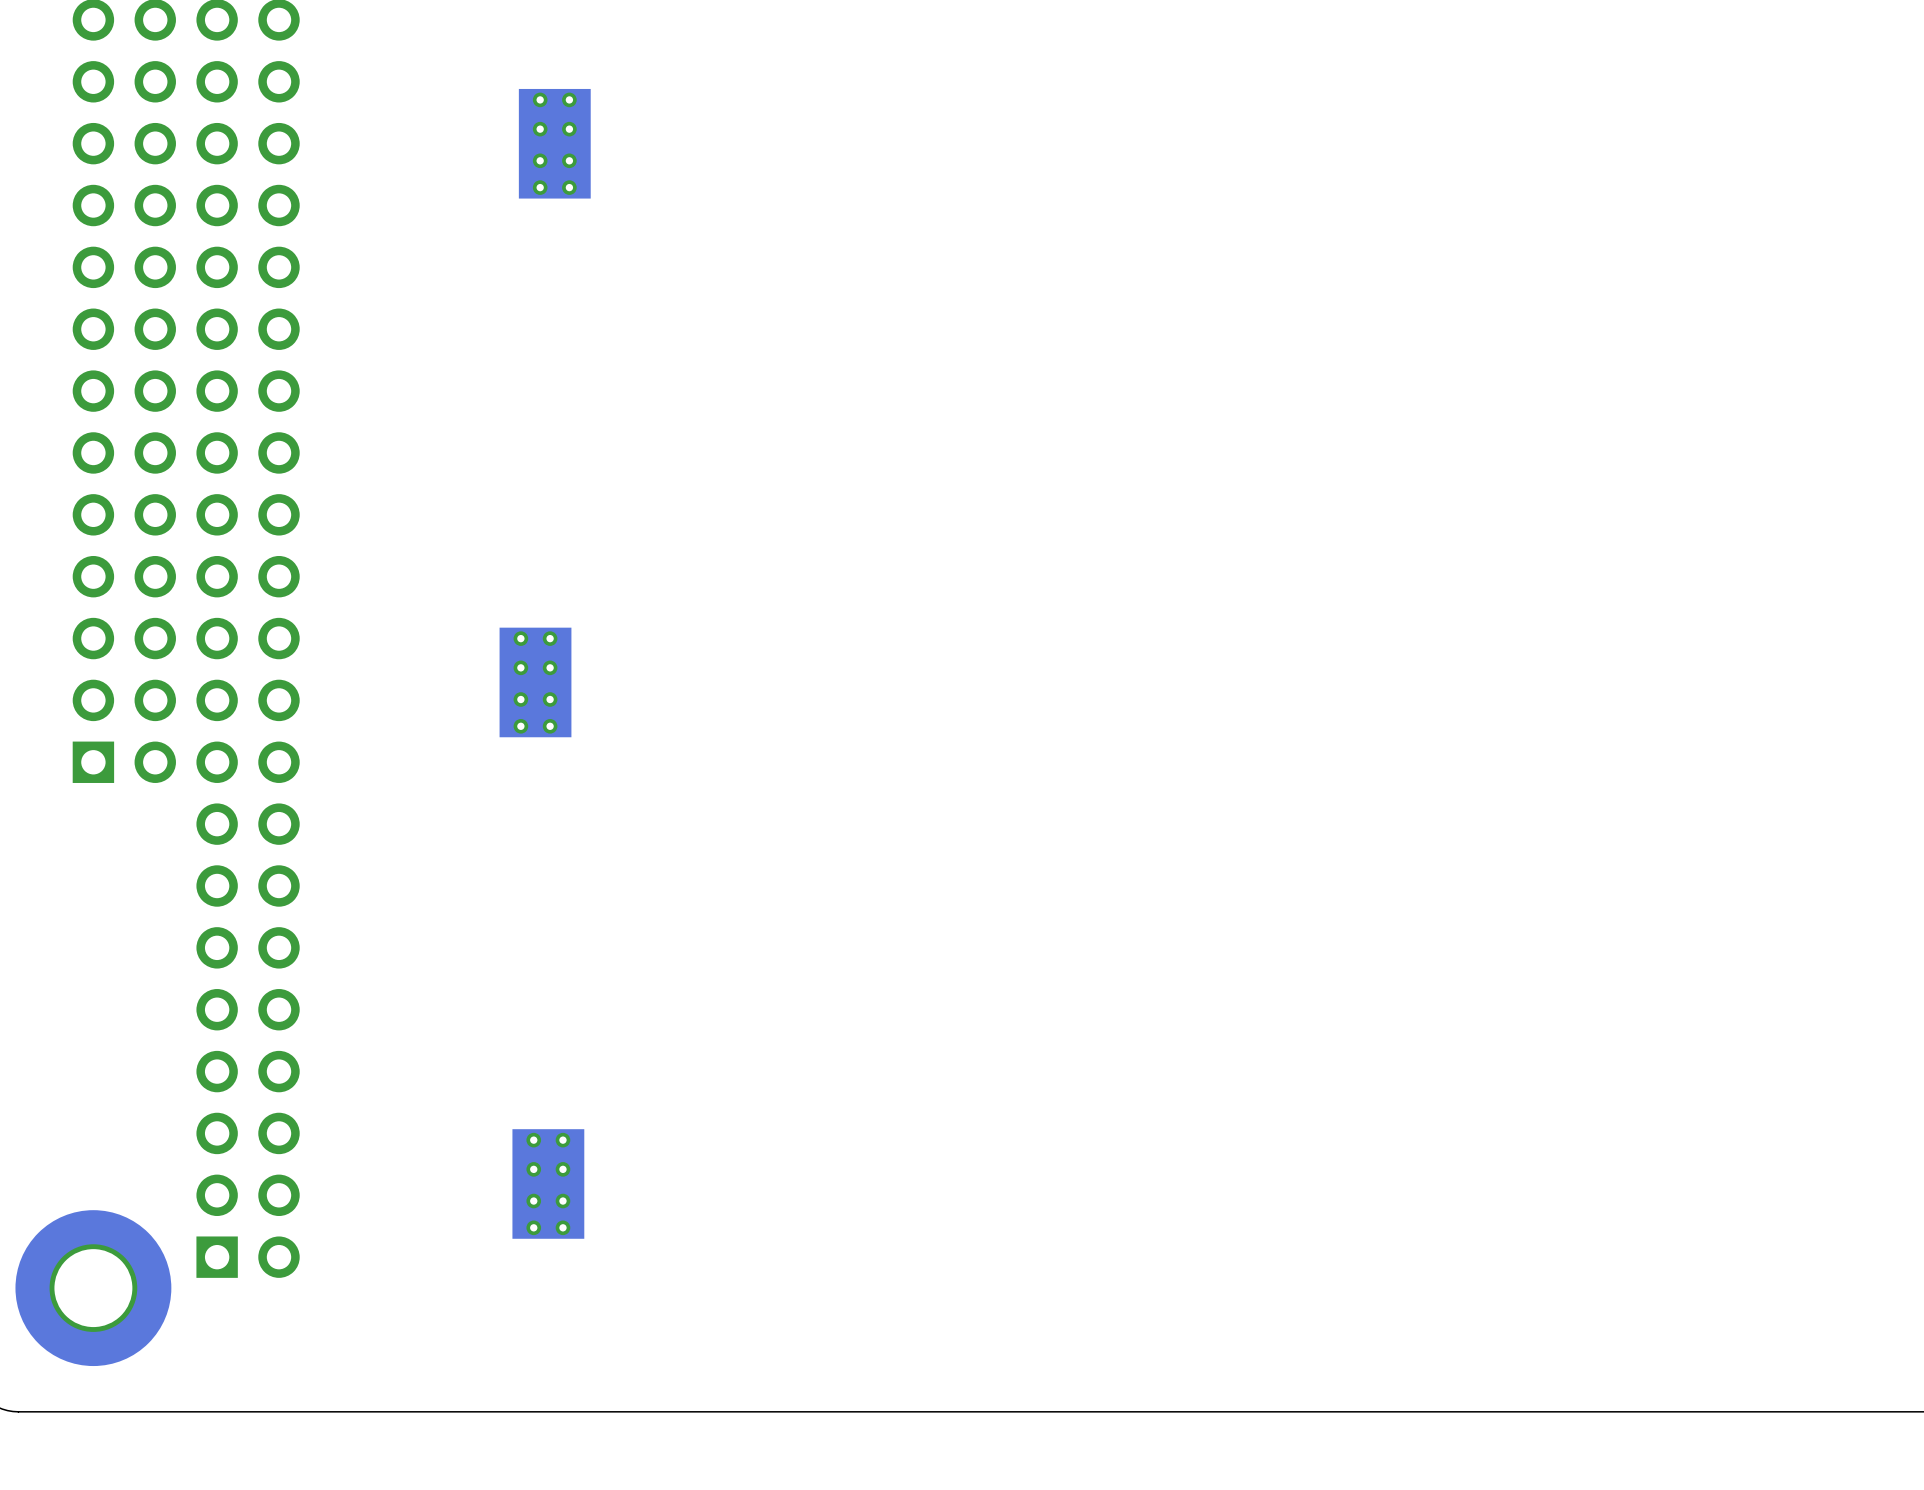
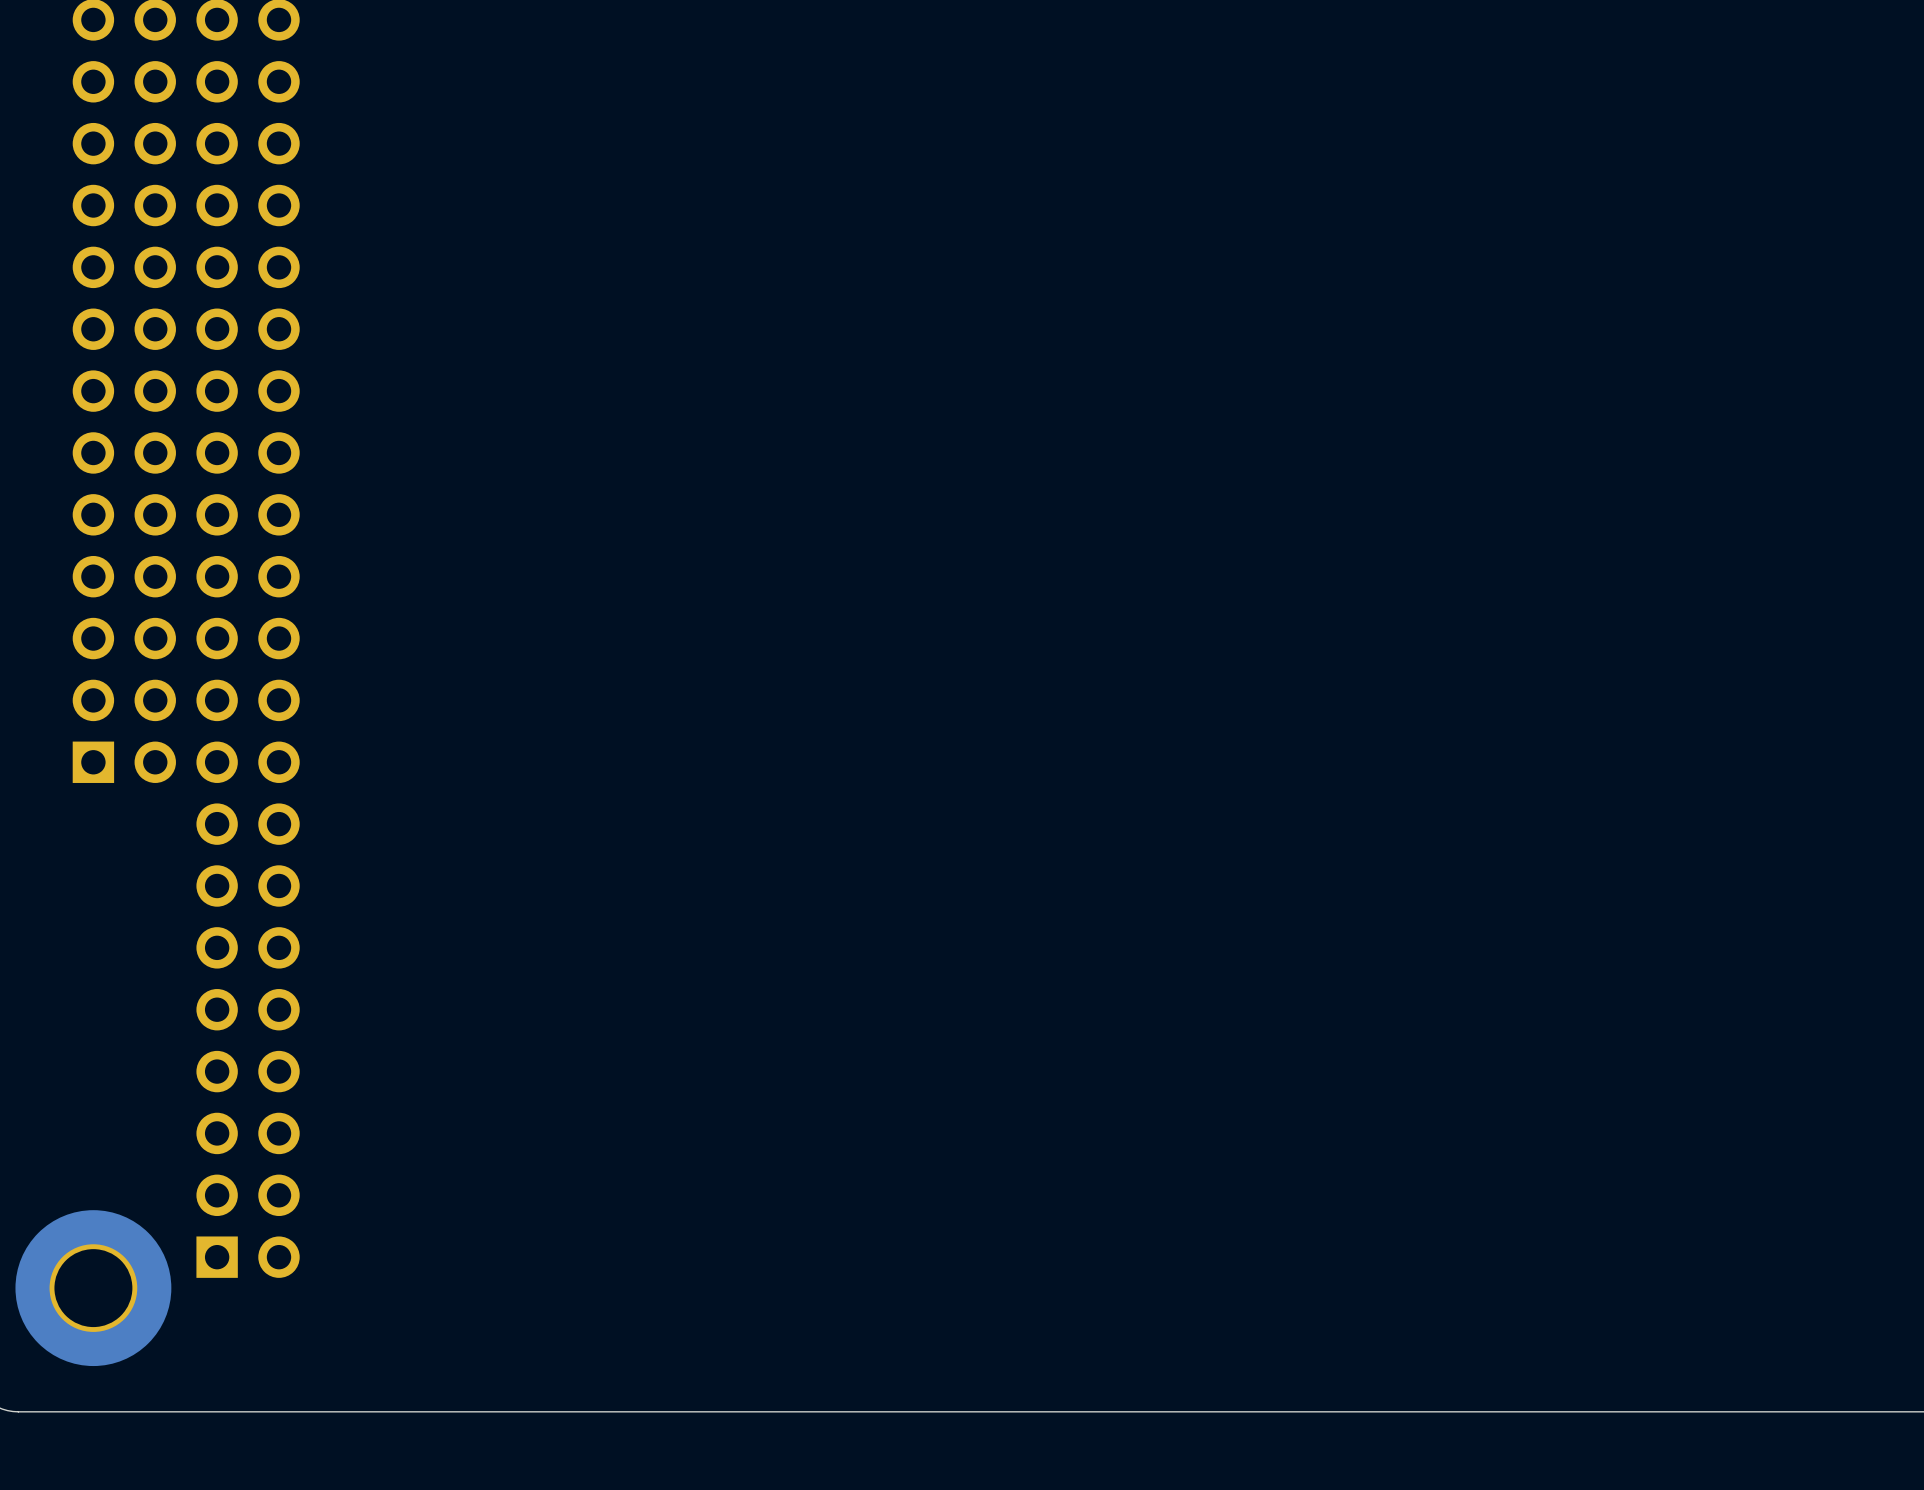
part: (554, 143) -> none
part: (535, 682) -> none
part: (548, 1183) -> none

